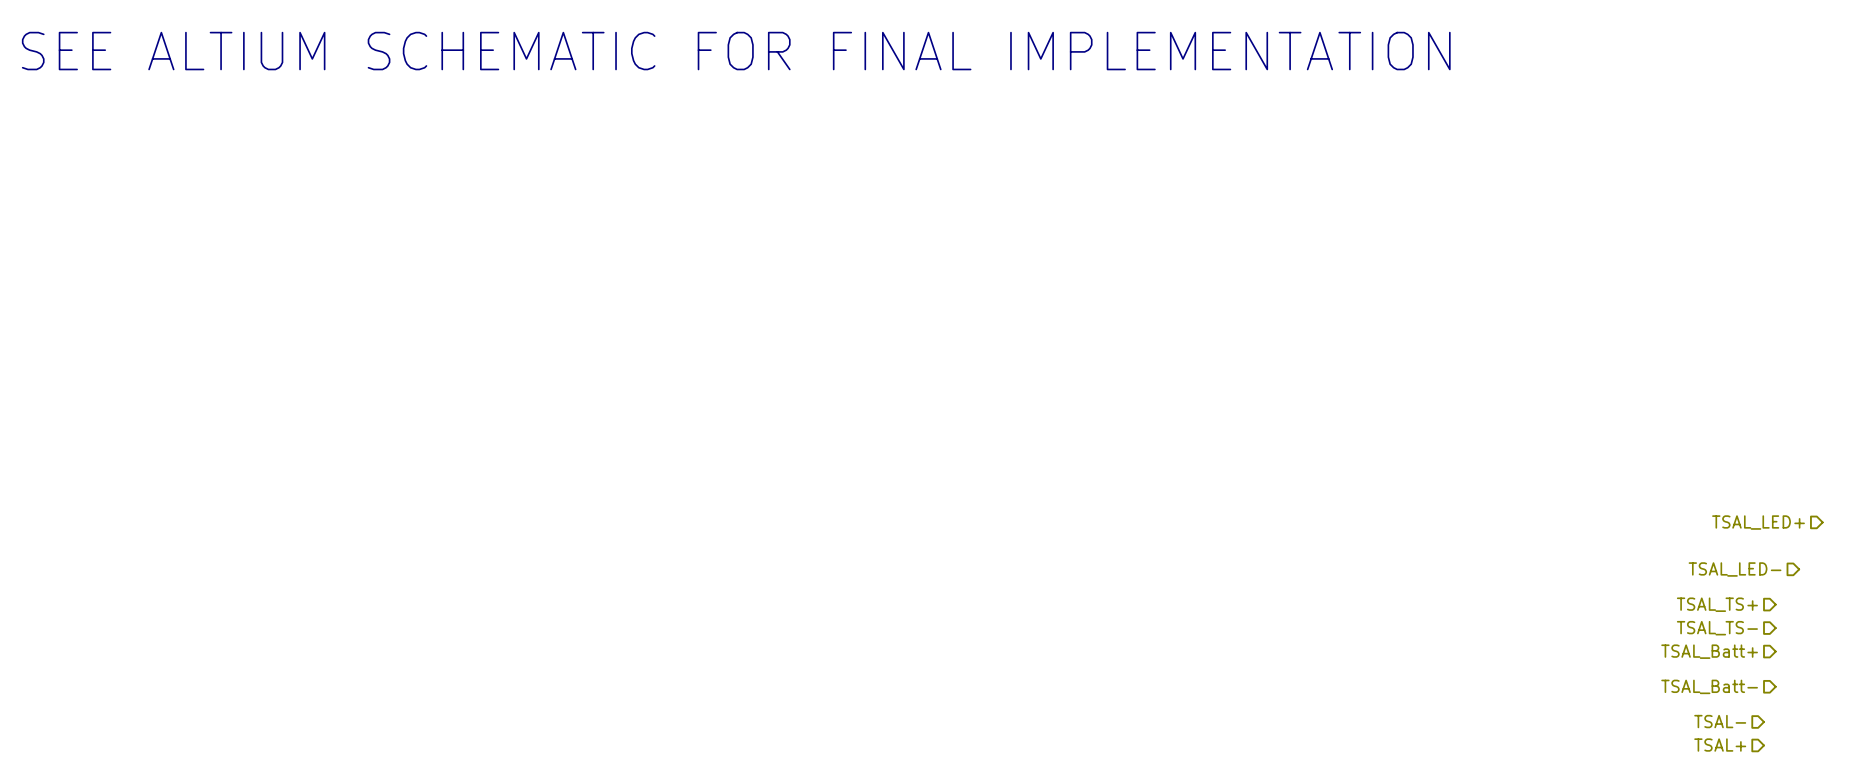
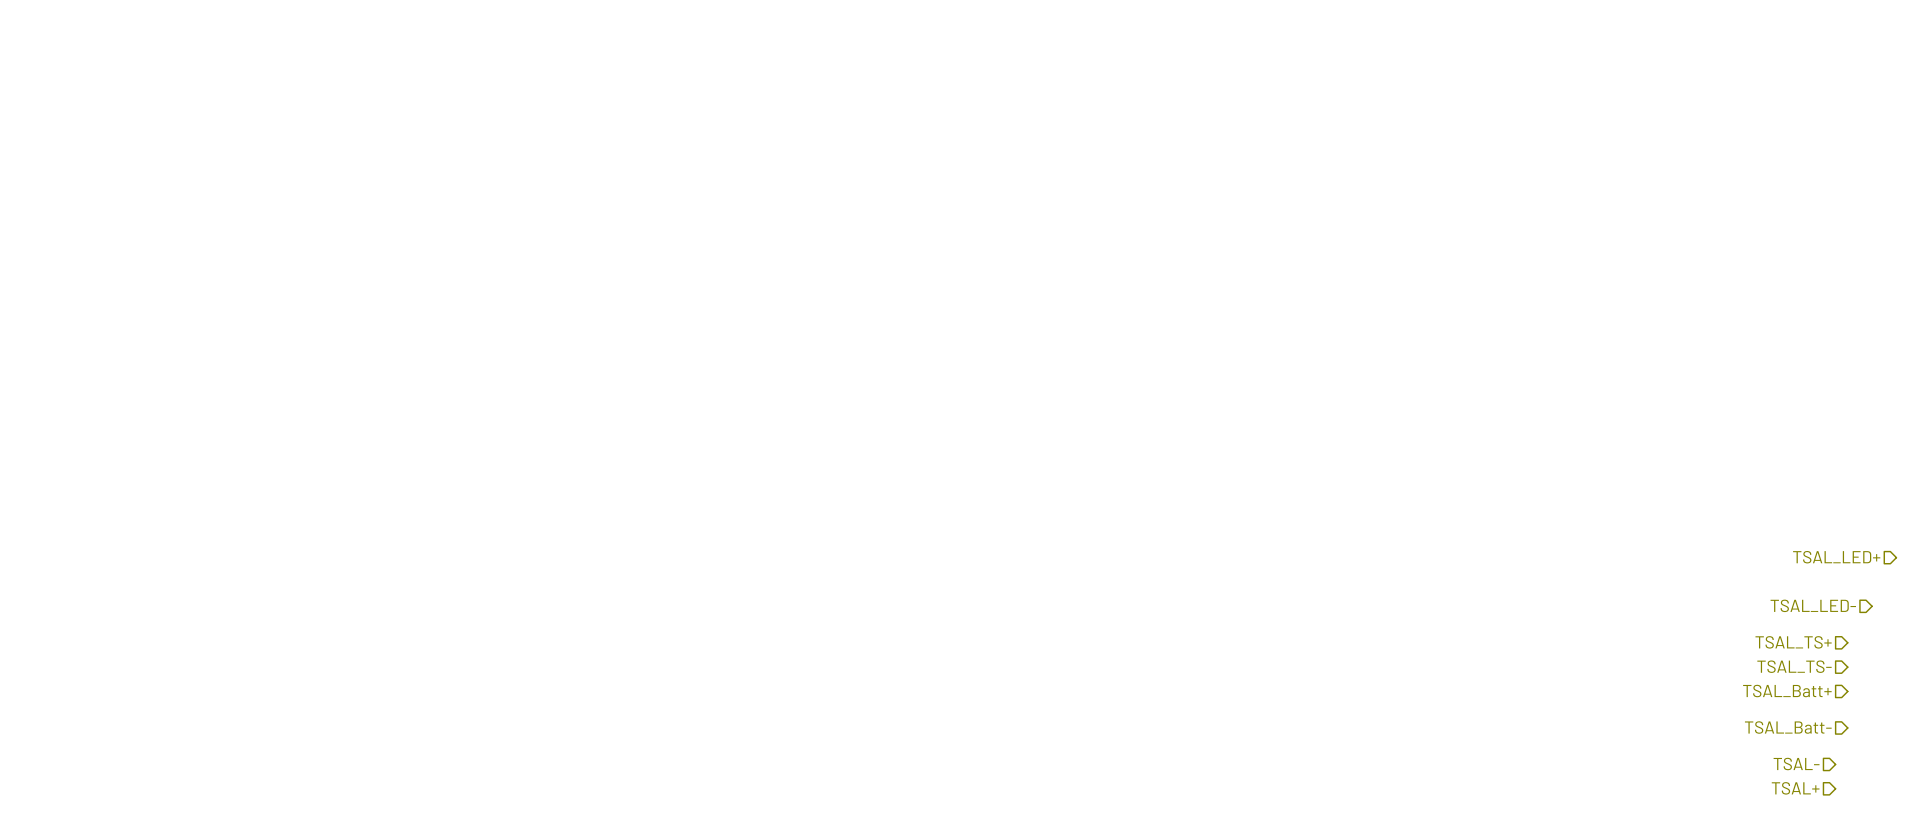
text: SEE ALTIUM SCHEMATIC FOR FINAL IMPLEMENTATION (736, 51) -> none

